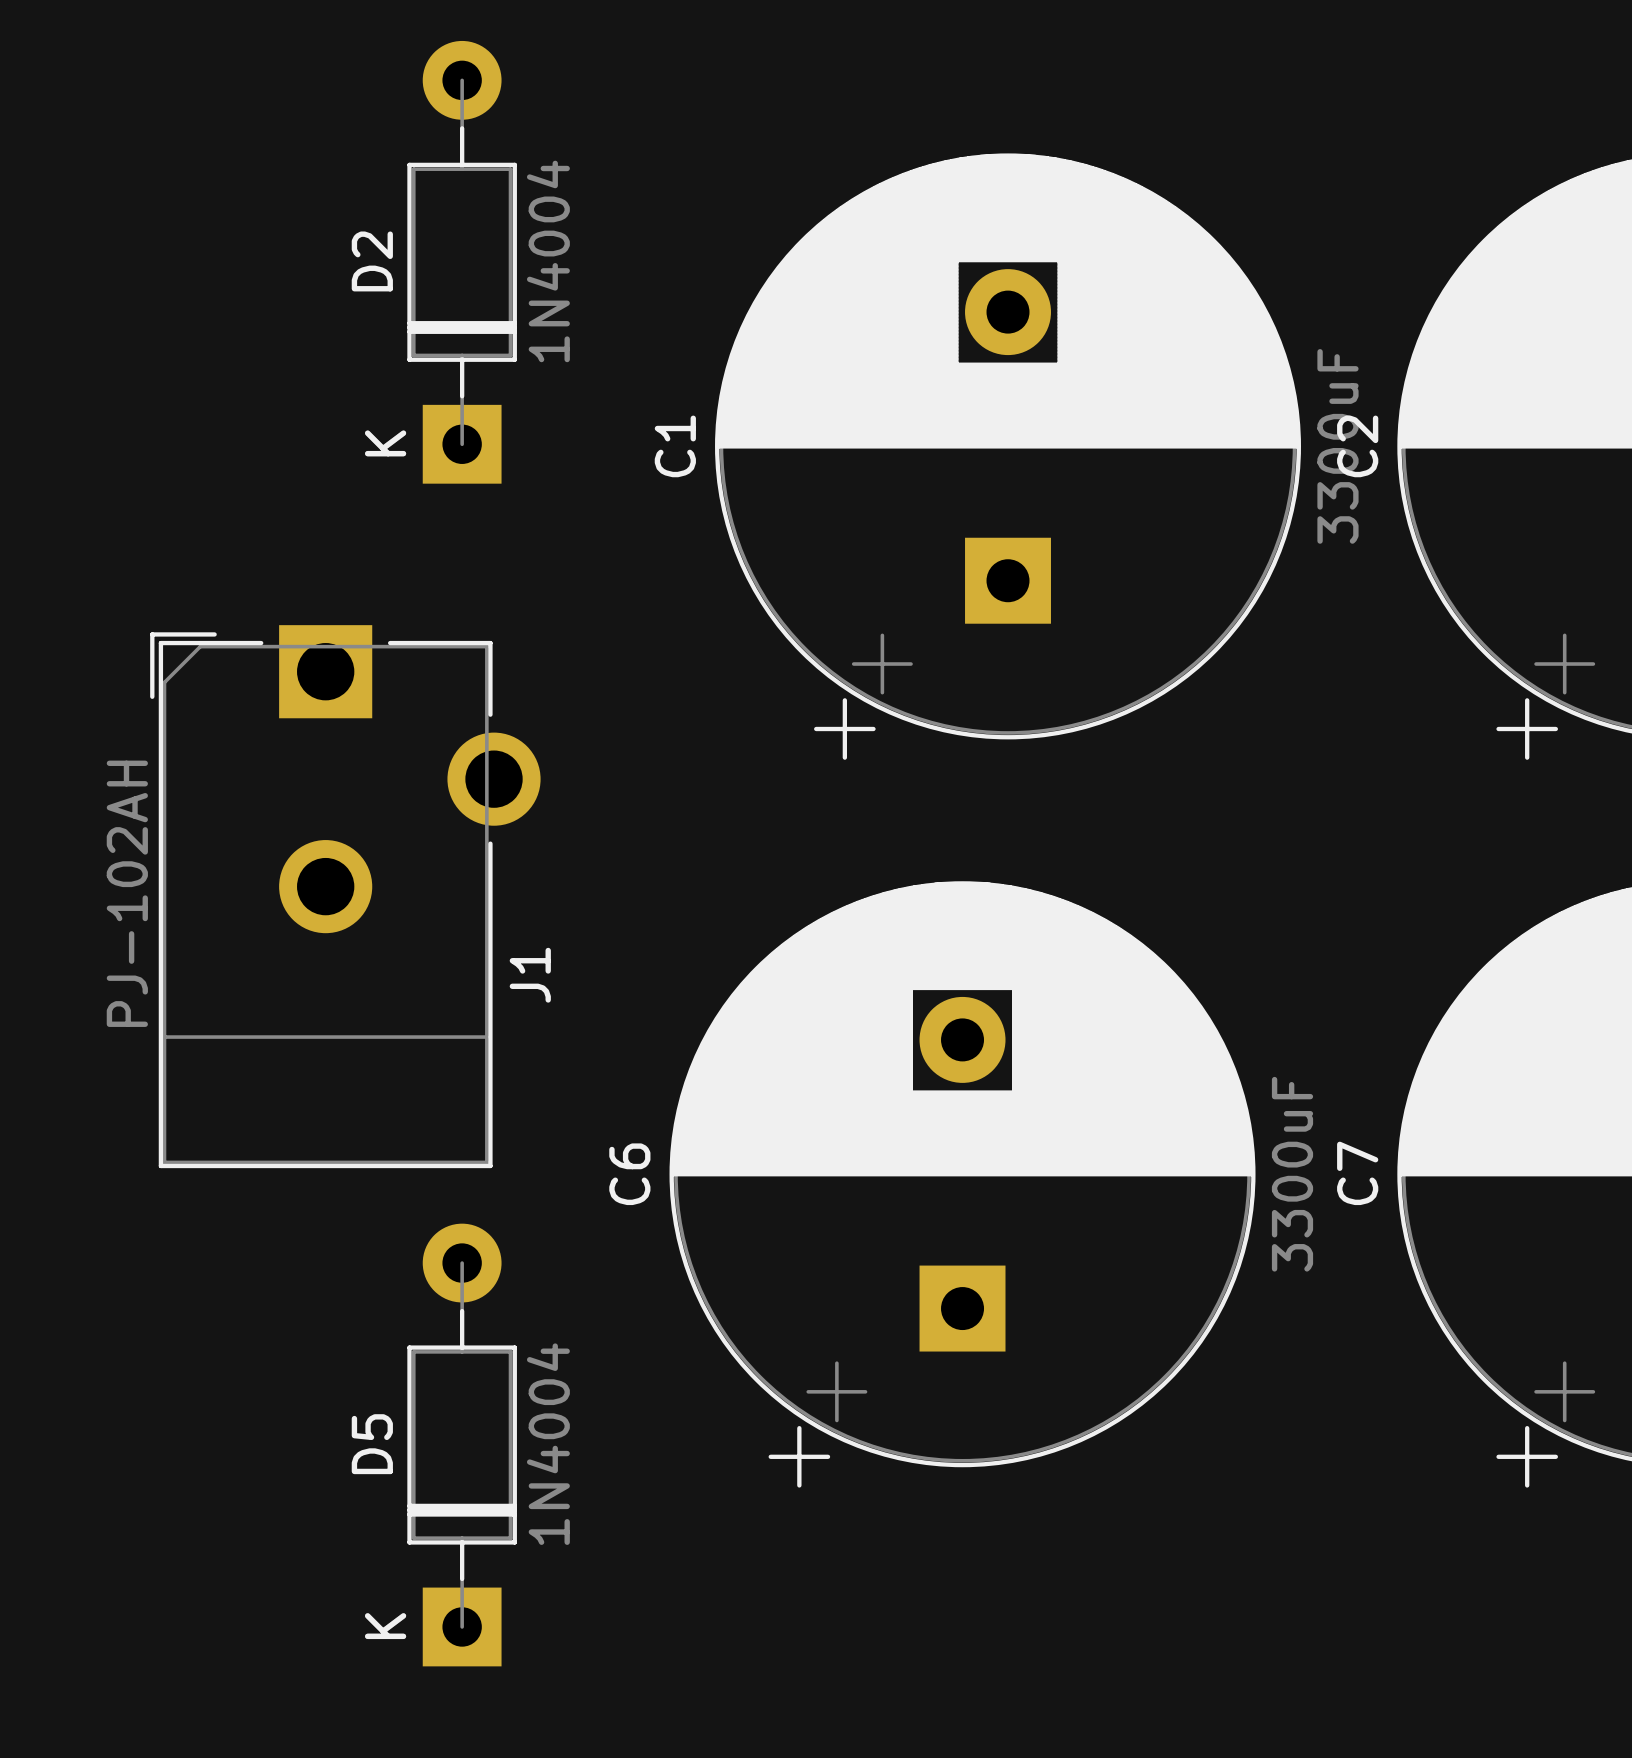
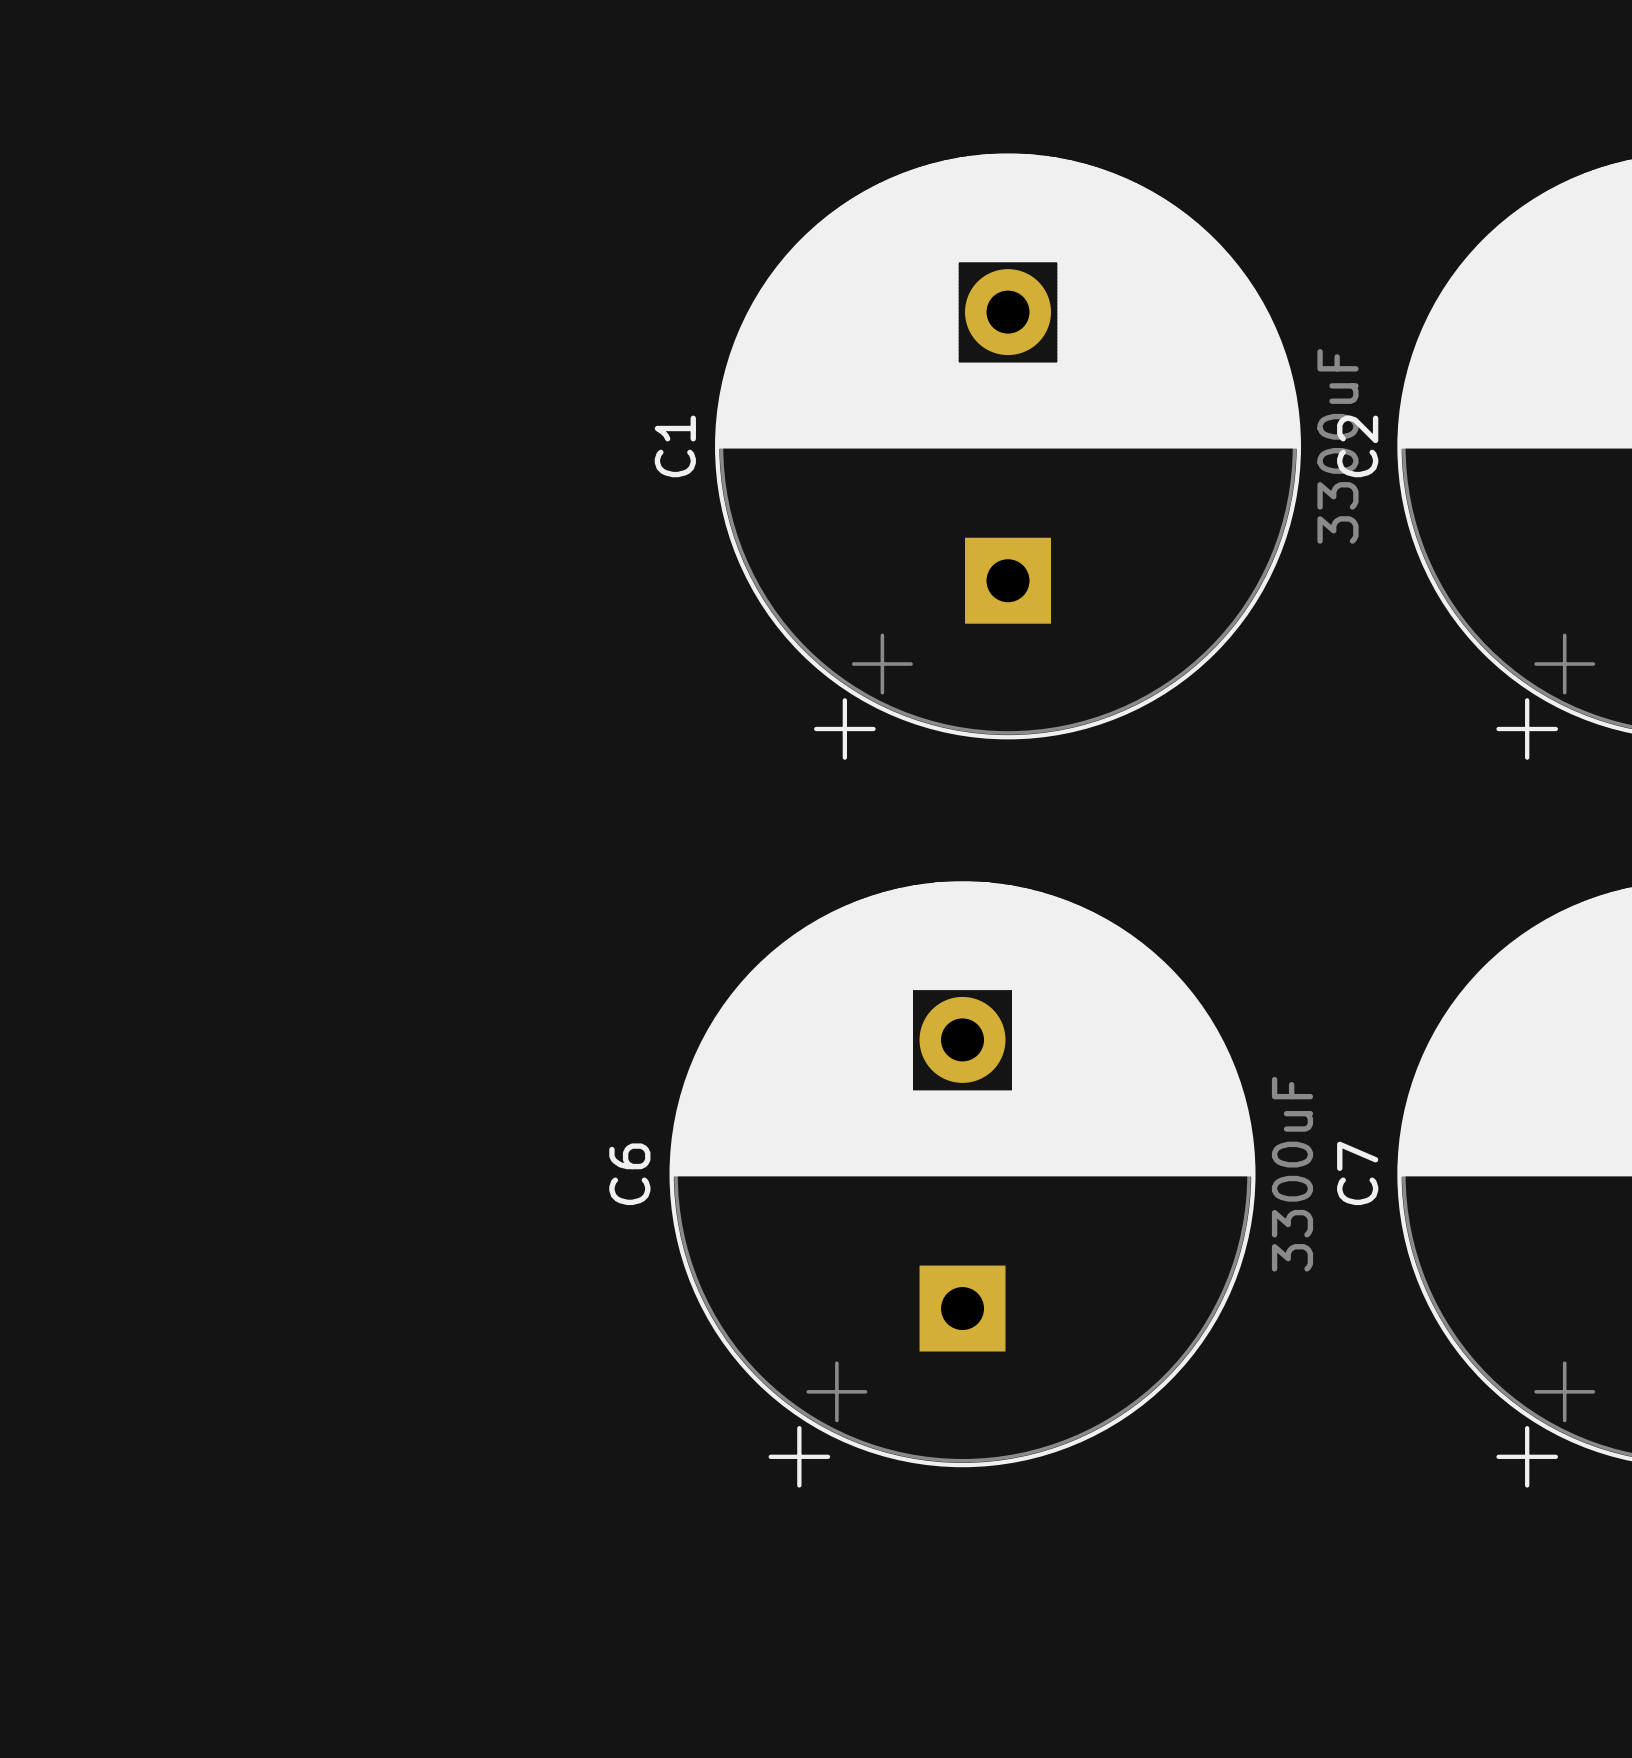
D2: 1N4004 (462, 262) -> none
J1: PJ-102AH (345, 896) -> none
D5: 1N4004 (462, 1445) -> none

